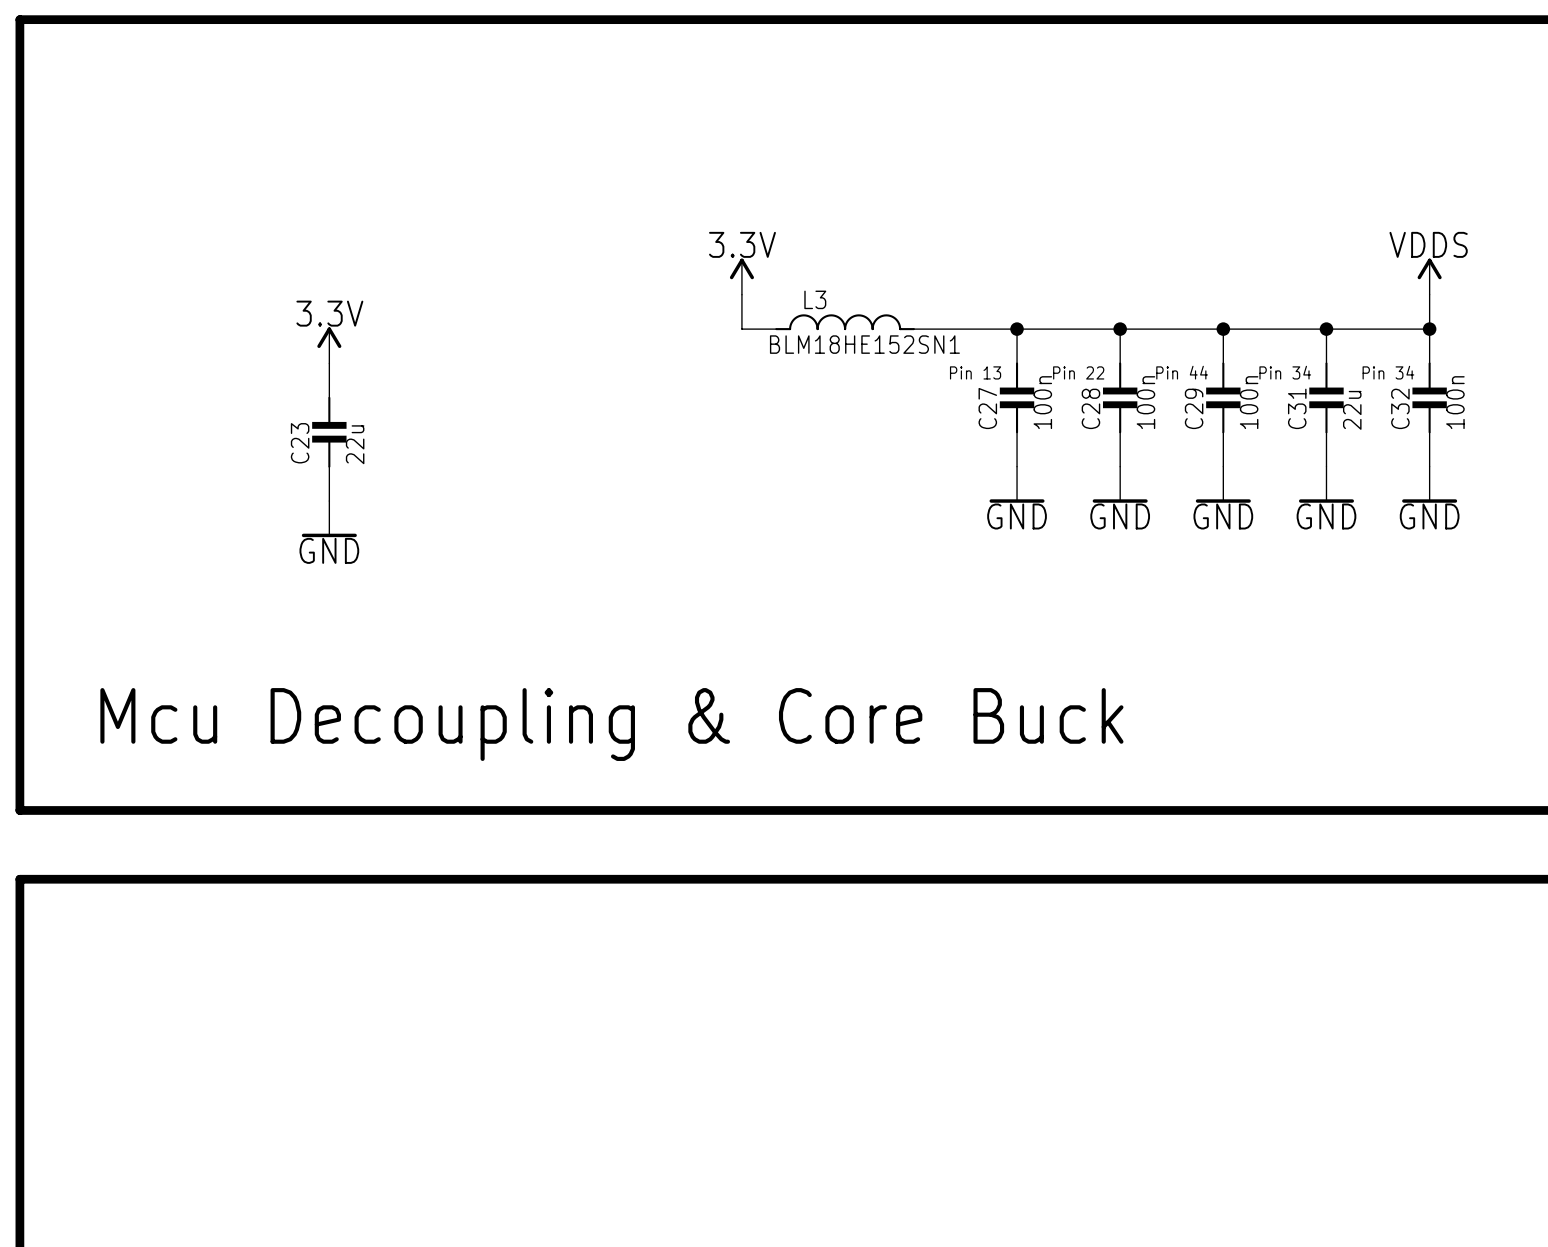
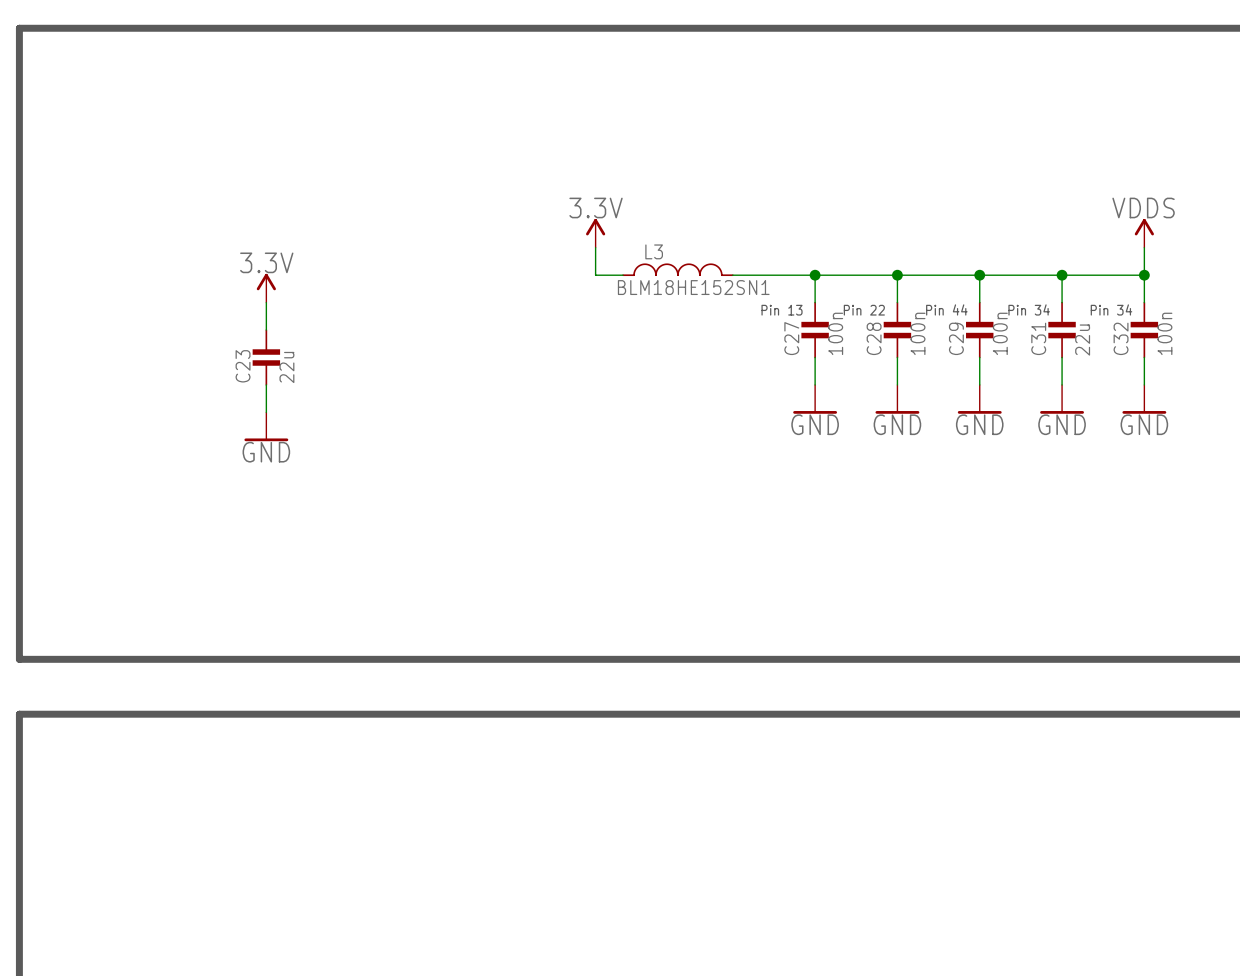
text: Mcu Decoupling & Core Buck (611, 724) -> none

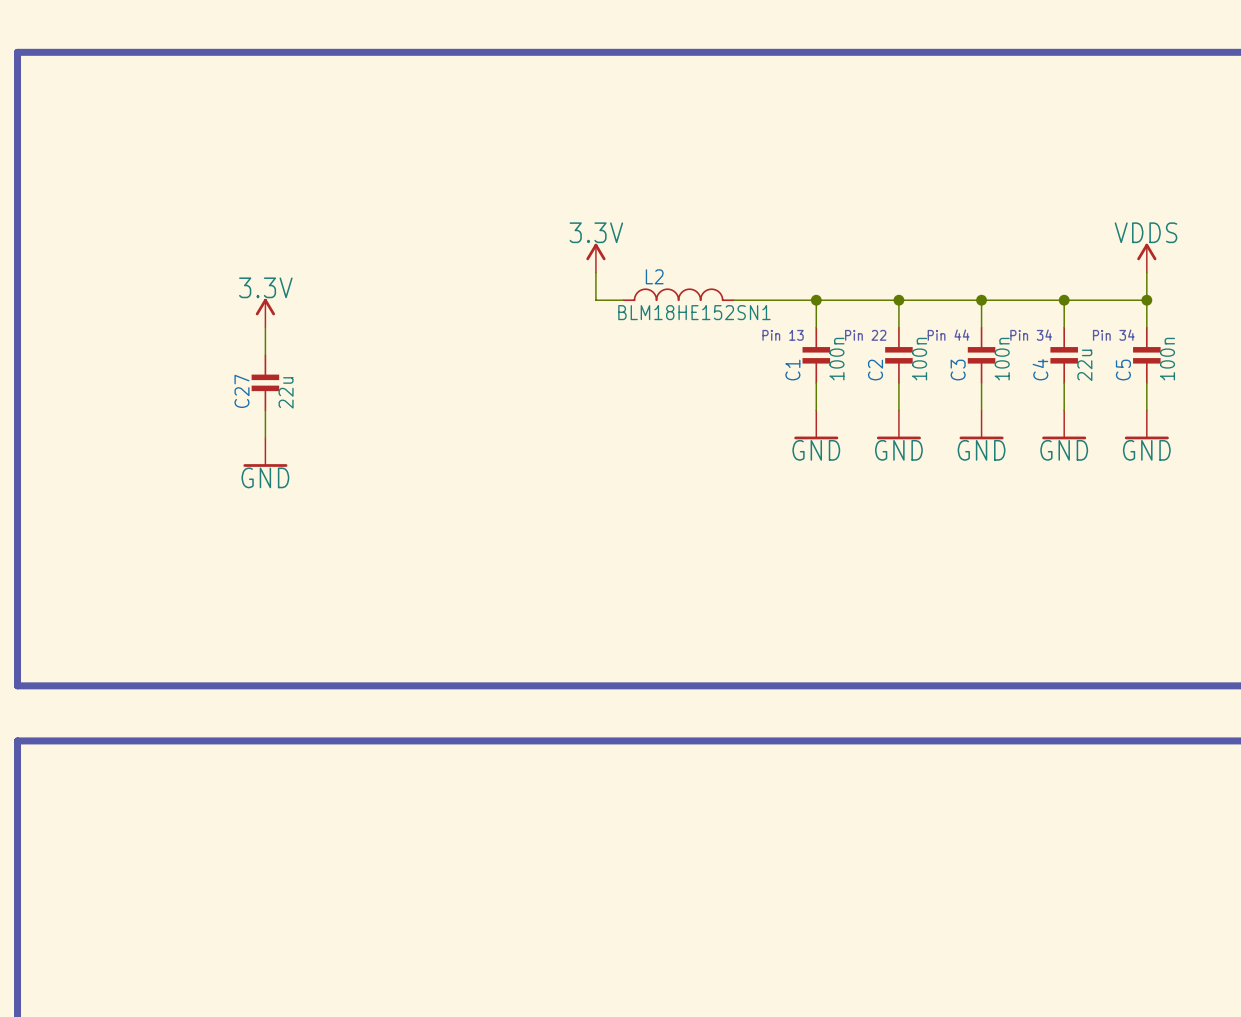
L3 name: L3 (654, 251) -> L2 (654, 276)
C27 name: C27 (791, 338) -> C1 (792, 370)
C28 name: C28 (874, 338) -> C2 (875, 370)
C29 name: C29 (956, 338) -> C3 (958, 370)
C31 name: C31 (1038, 338) -> C4 (1040, 369)
C32 name: C32 (1121, 338) -> C5 (1123, 370)
C23 name: C23 (243, 366) -> C27 (241, 391)

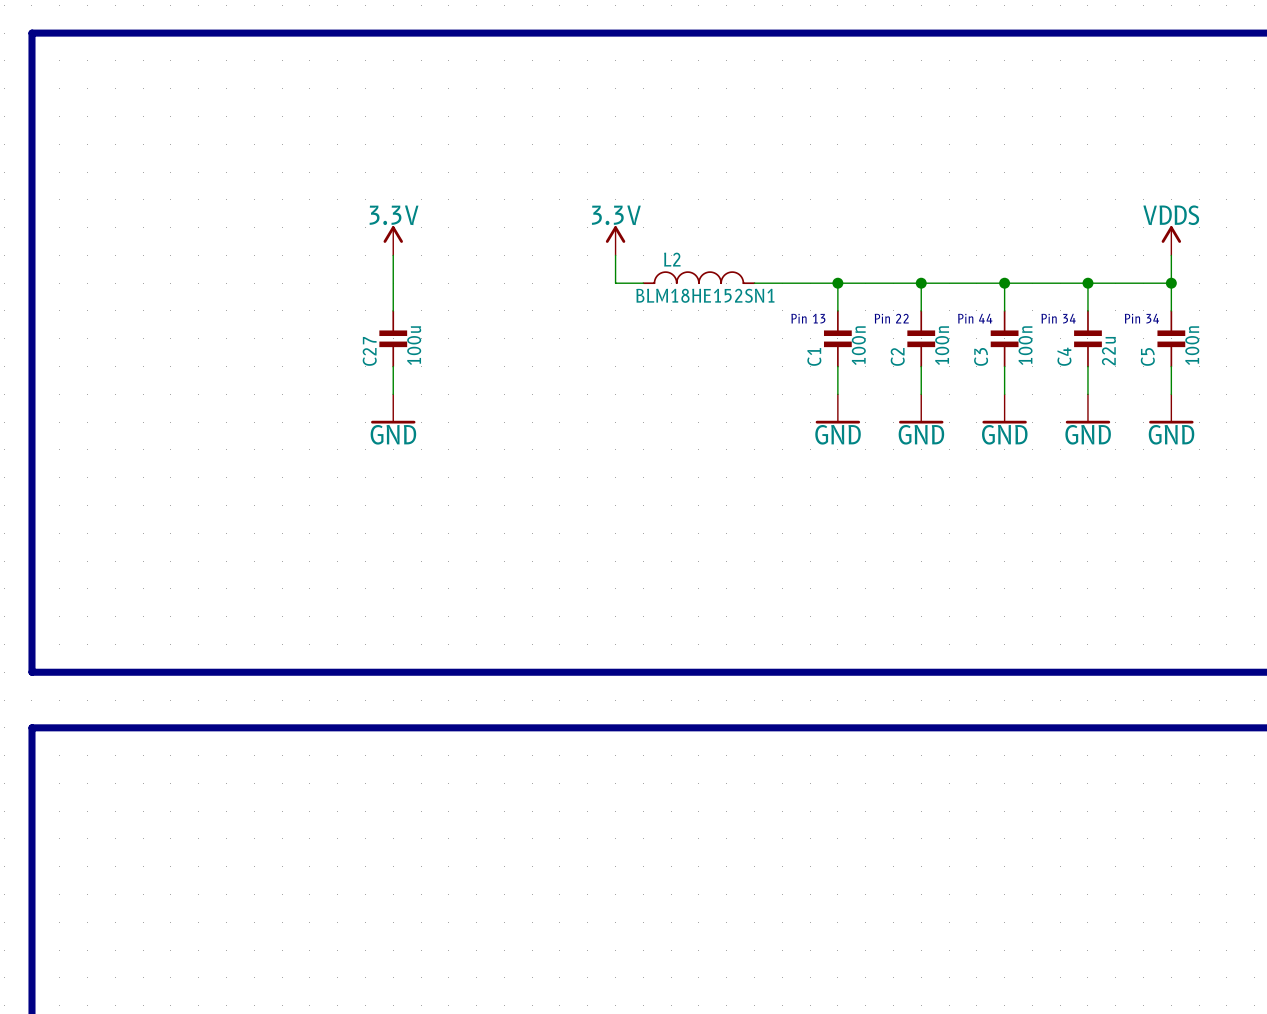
wire: none -> (393, 255) (393, 310)
power symbol position: 3.3V (265, 313) -> 3.3V (393, 240)
wire: (265, 327) (265, 355) -> none
C27 position: (265, 382) -> (393, 338)
C27 value: 22u (286, 392) -> 100u (414, 345)
wire: (265, 410) (265, 437) -> (393, 366) (393, 394)
power symbol position: GND (265, 452) -> GND (393, 408)

